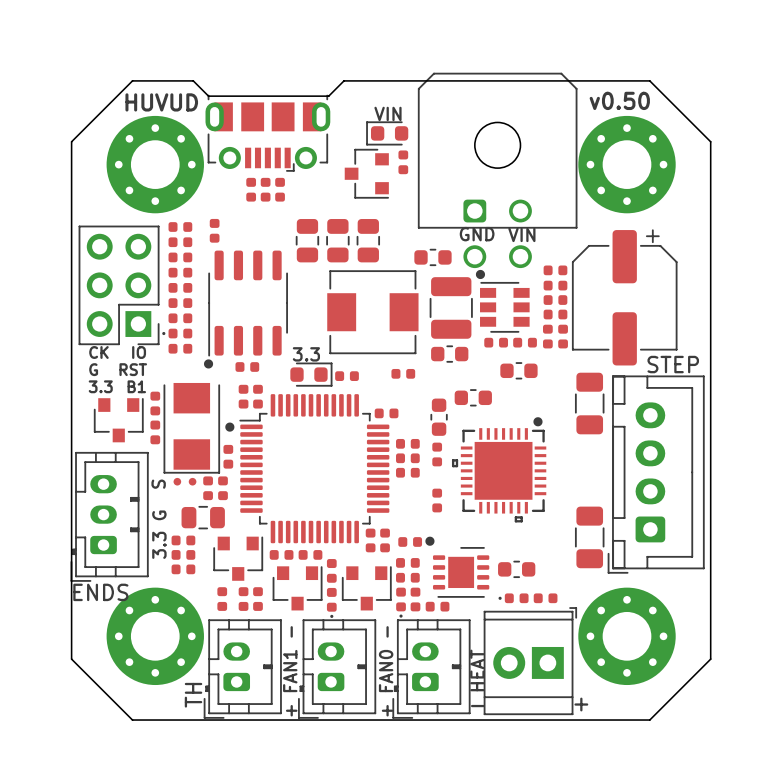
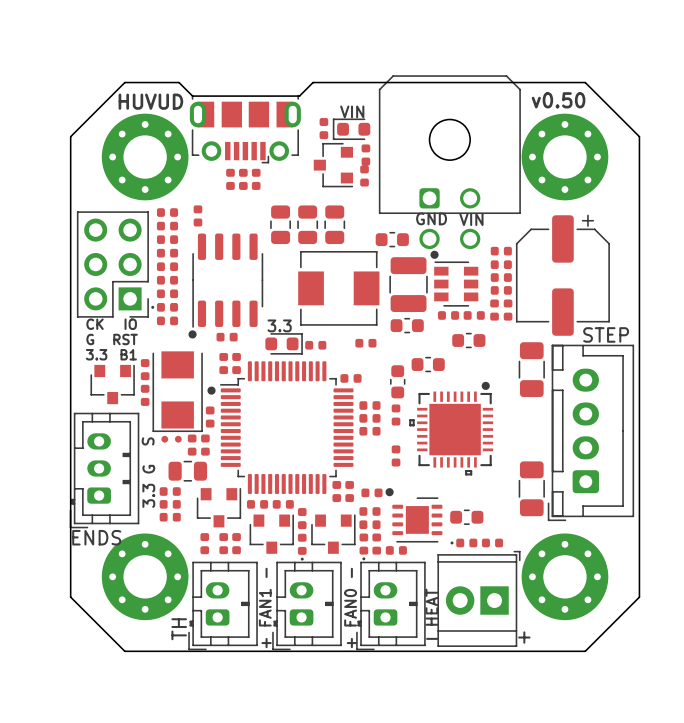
part: none -> (323, 128)
part: none -> (364, 175)

